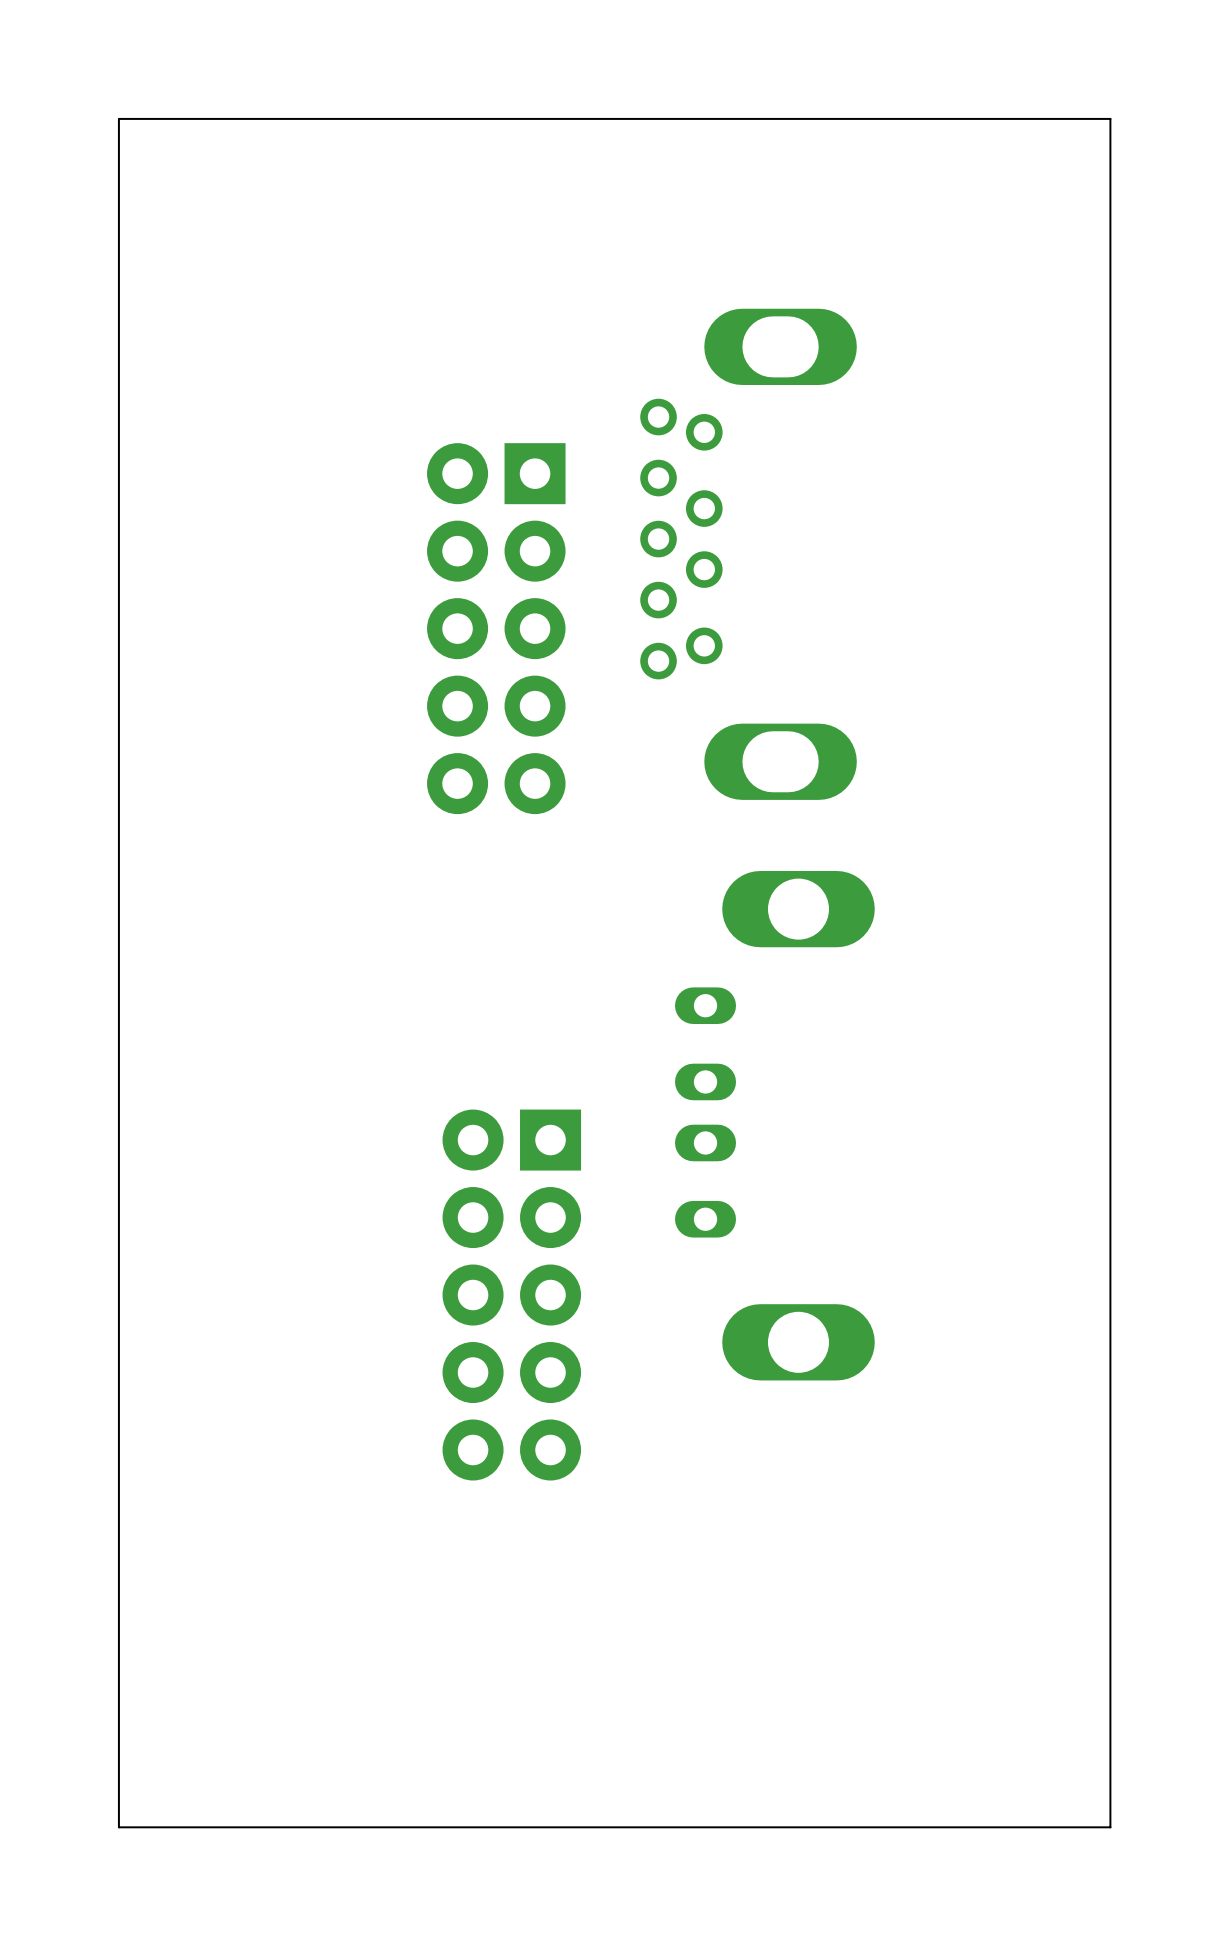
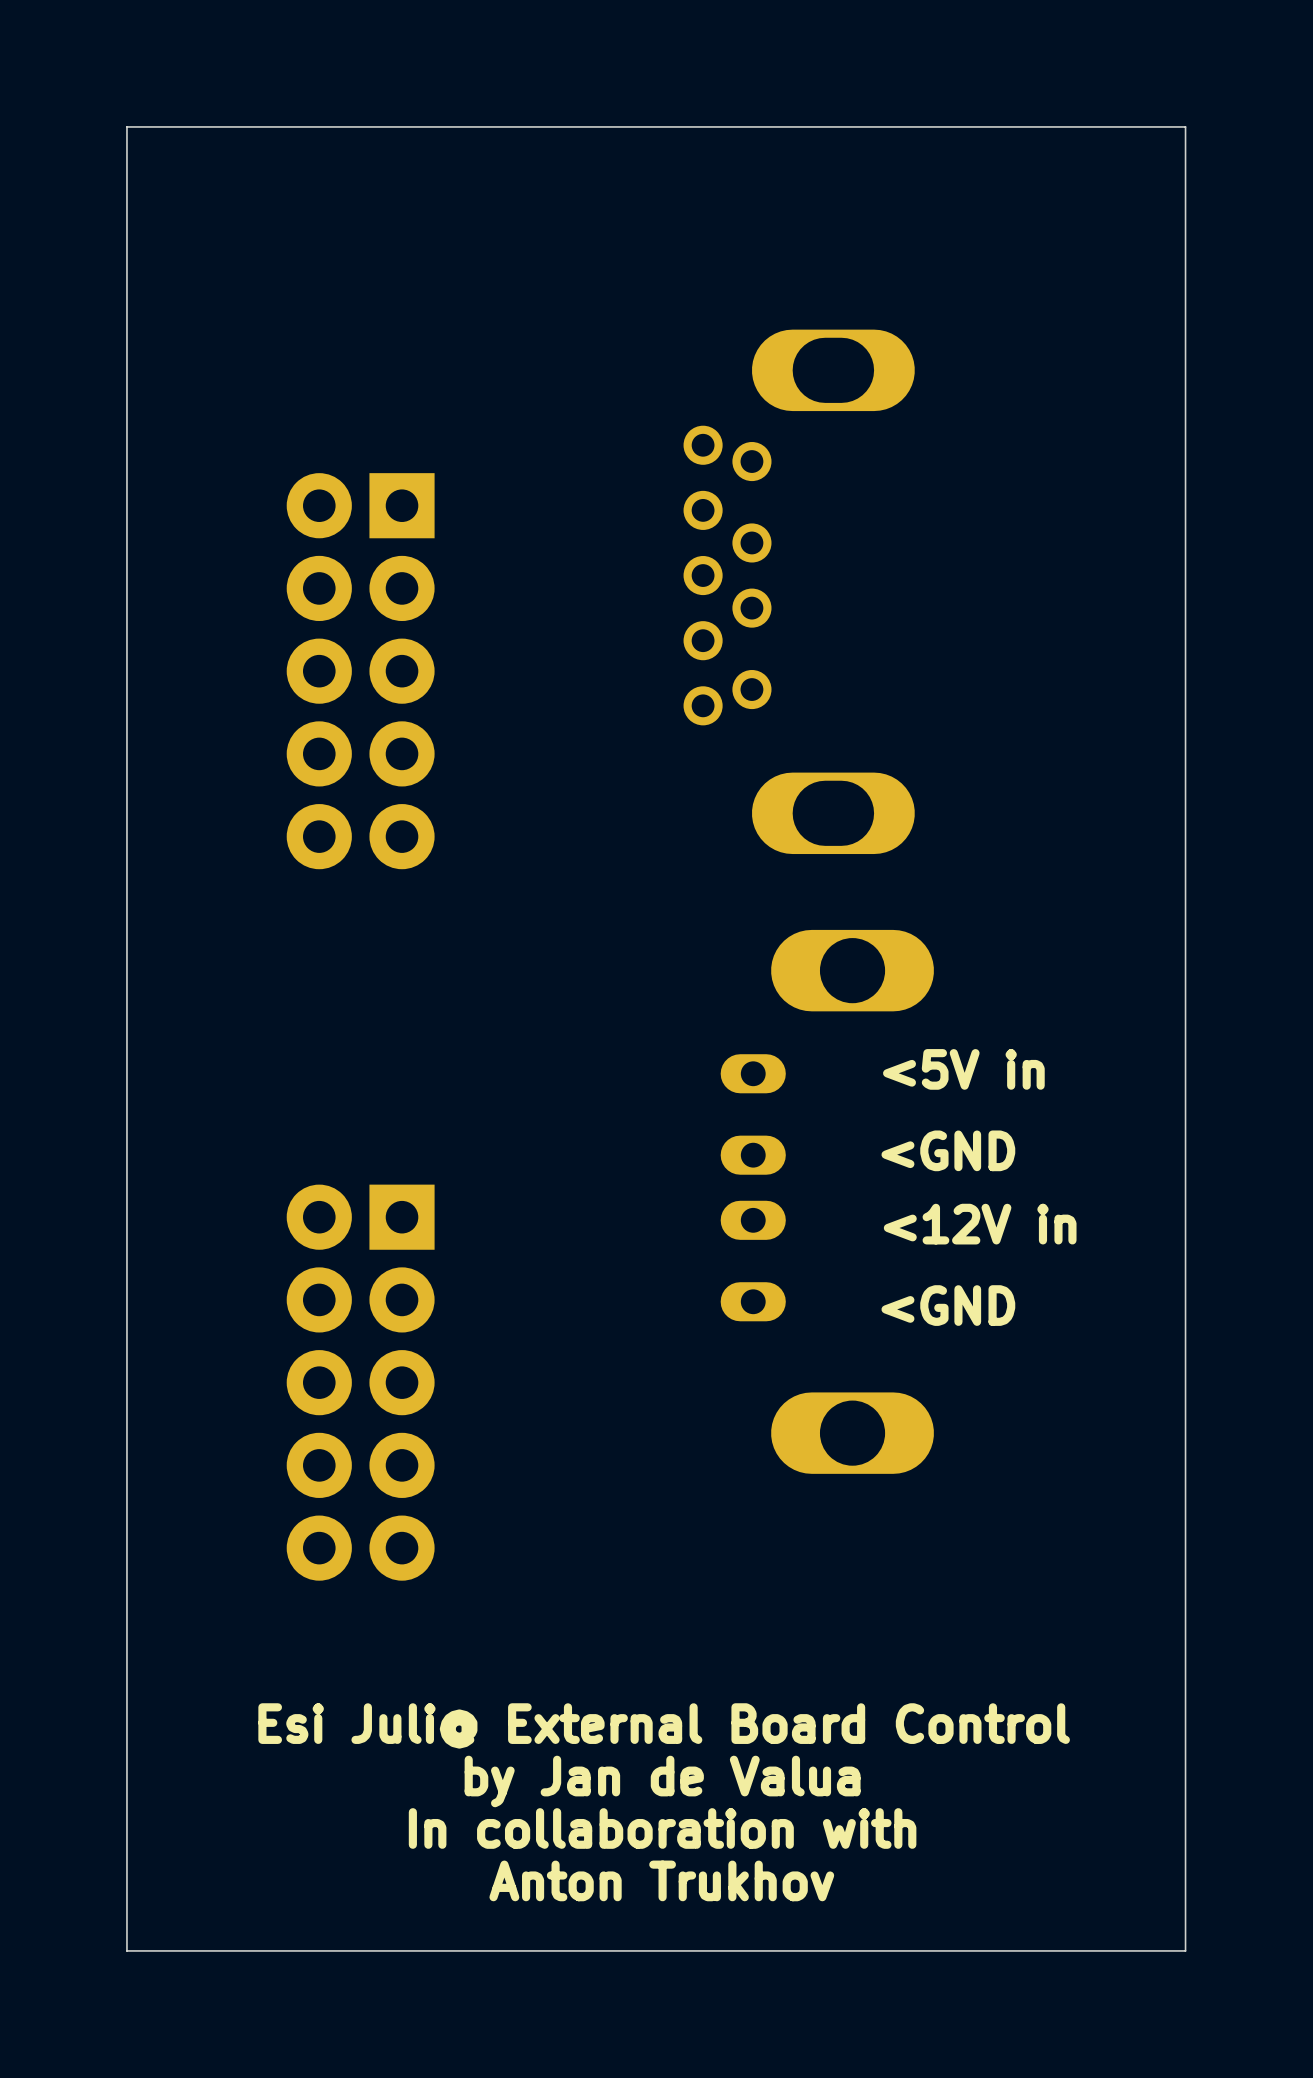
part position: (496, 628) -> (360, 671)
text: none -> <5V in (963, 1069)
text: none -> <GND (948, 1150)
text: none -> <12V in (980, 1224)
text: none -> <GND (948, 1305)
part position: (511, 1295) -> (360, 1382)
text: none -> Esi Juli@ External Board Control (664, 1725)
text: none -> by Jan de Valua (662, 1781)
text: none -> In collaboration with (662, 1828)
text: none -> Anton Trukhov (661, 1880)

